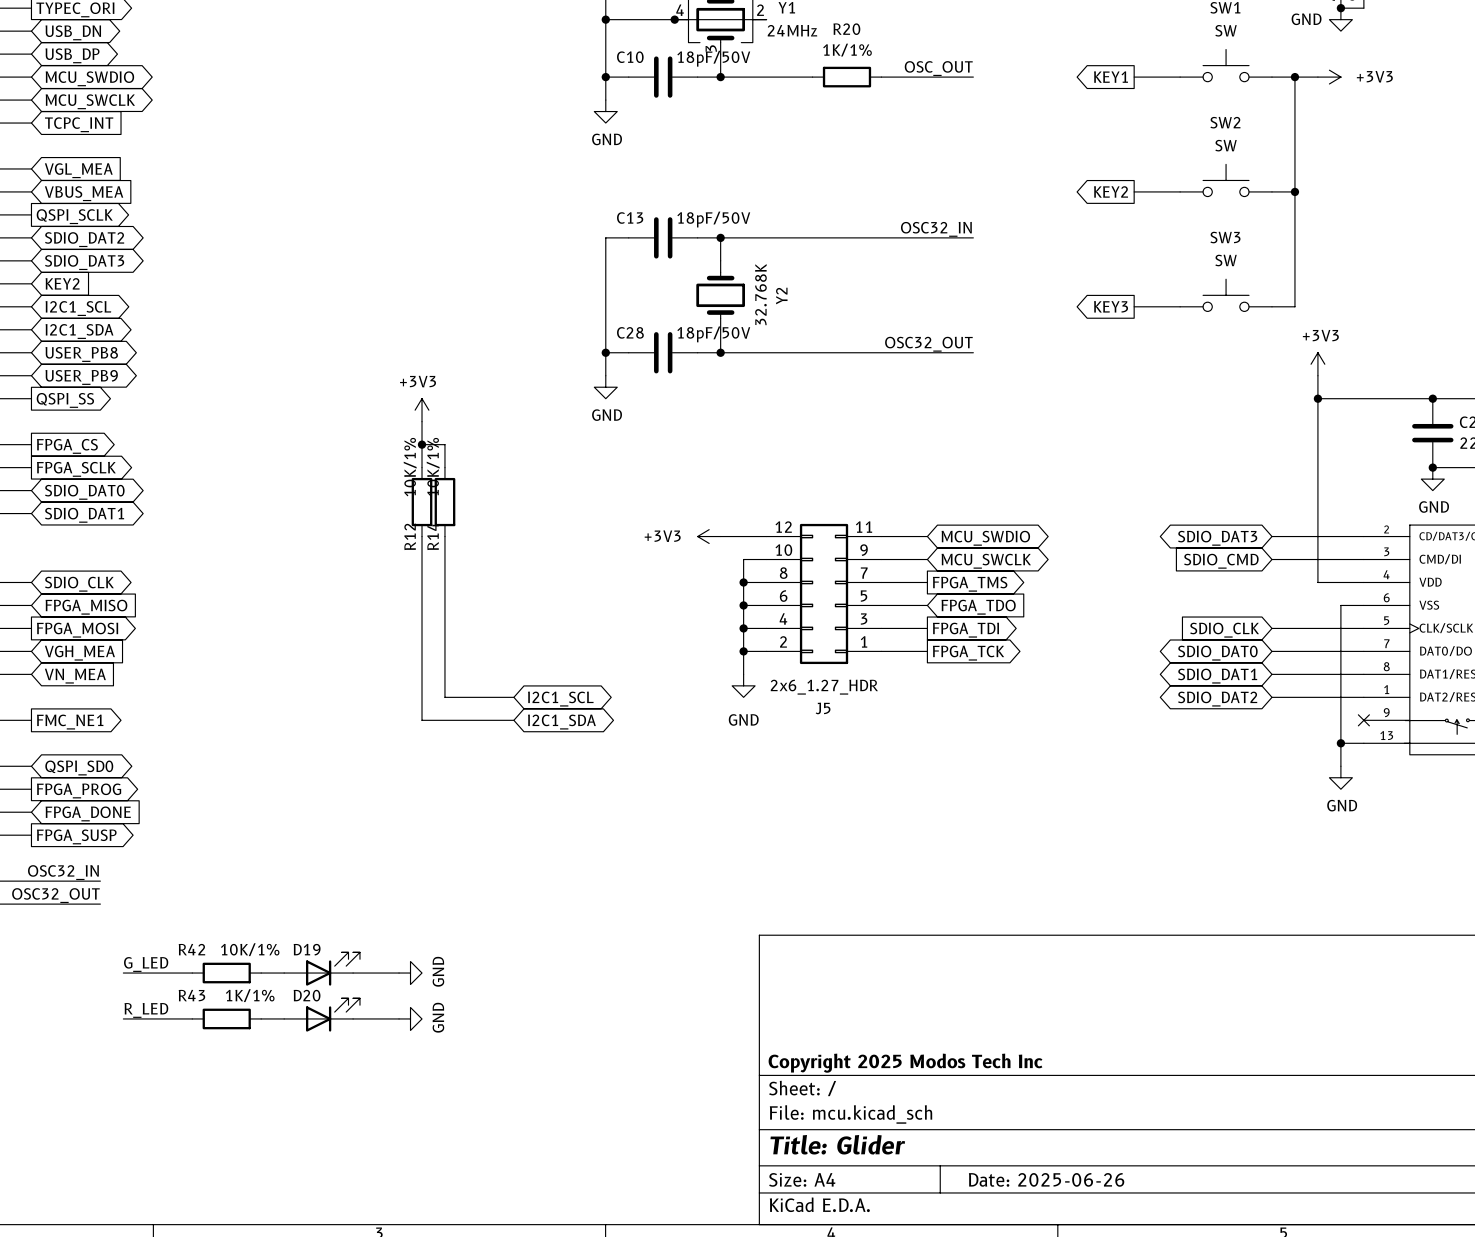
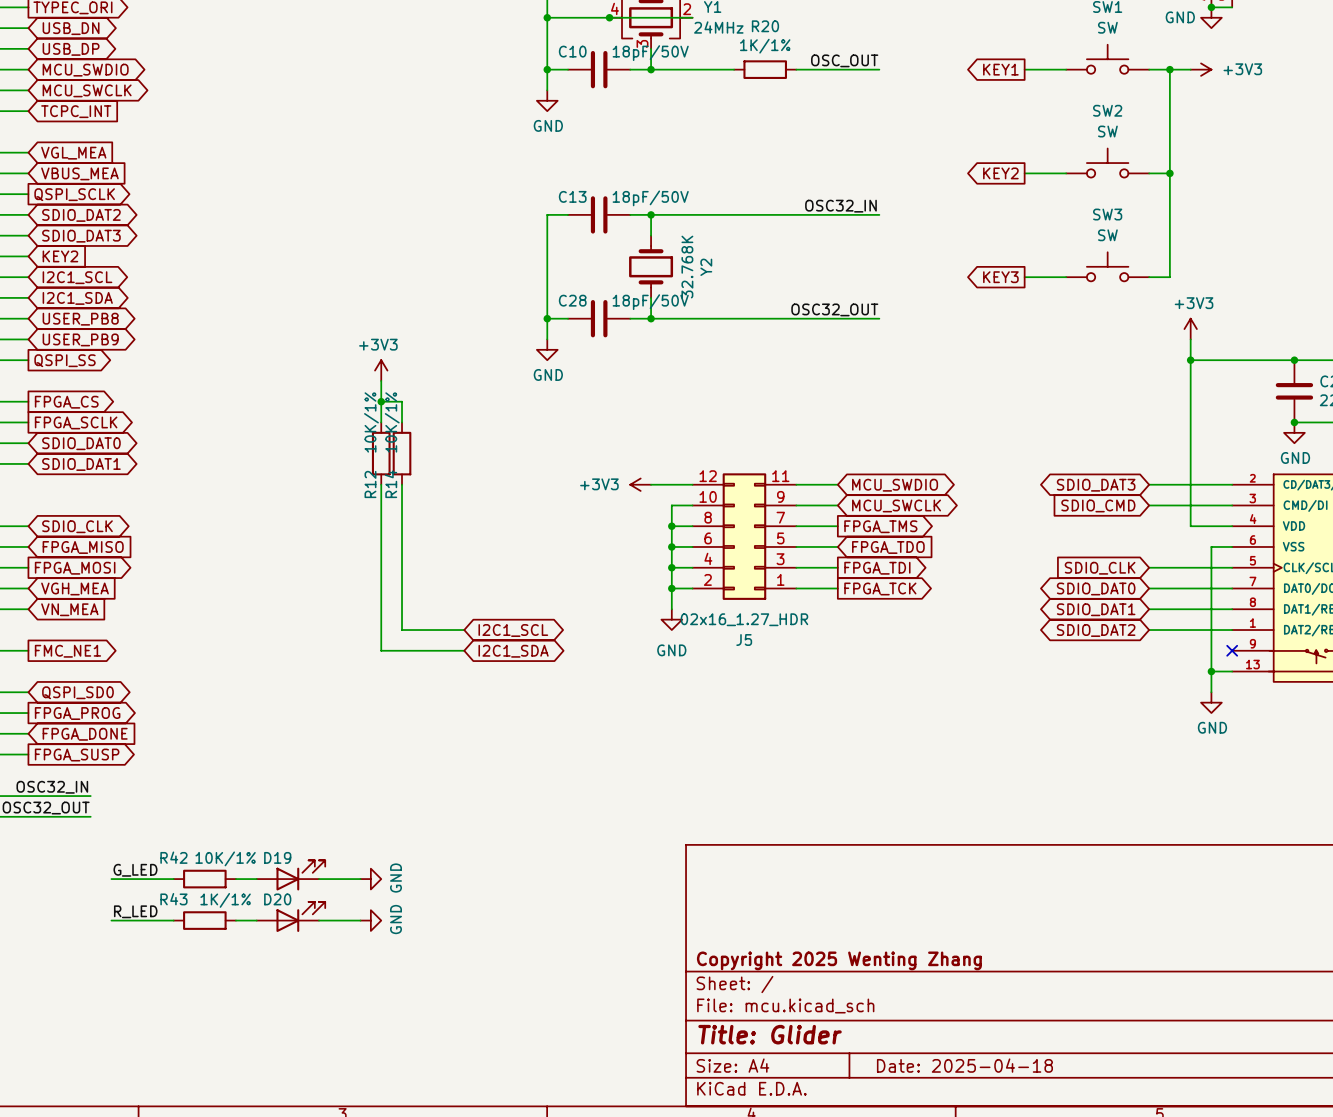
J5 value: 2x6_1.27_HDR (824, 687) -> 02x16_1.27_HDR (744, 619)
title block: Copyright 2025 Modos Tech Inc (905, 1063) -> Copyright 2025 Wenting Zhang (839, 960)
title block: Date: 2025-06-26 (1046, 1179) -> Date: 2025-04-18 (964, 1065)

